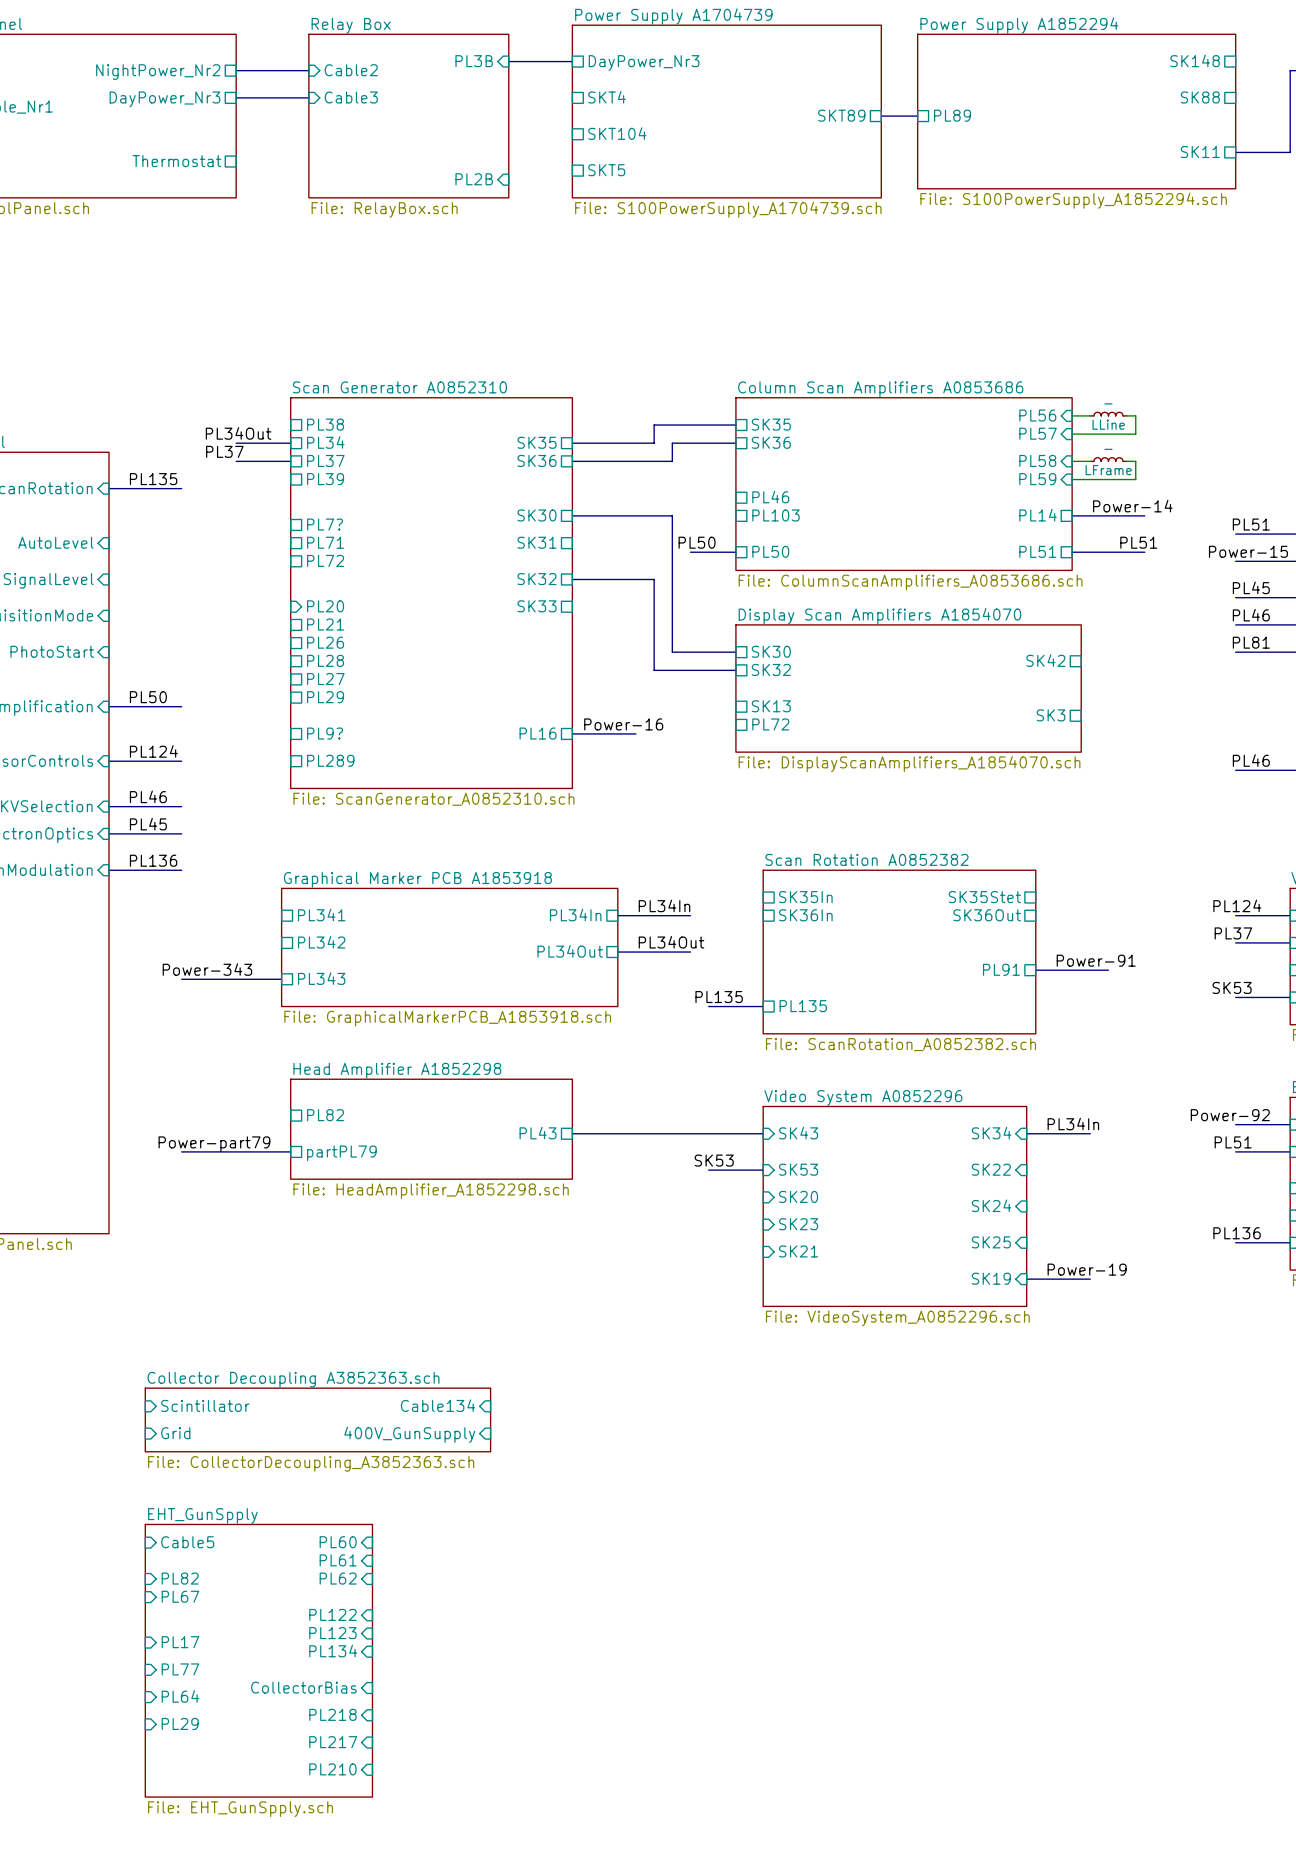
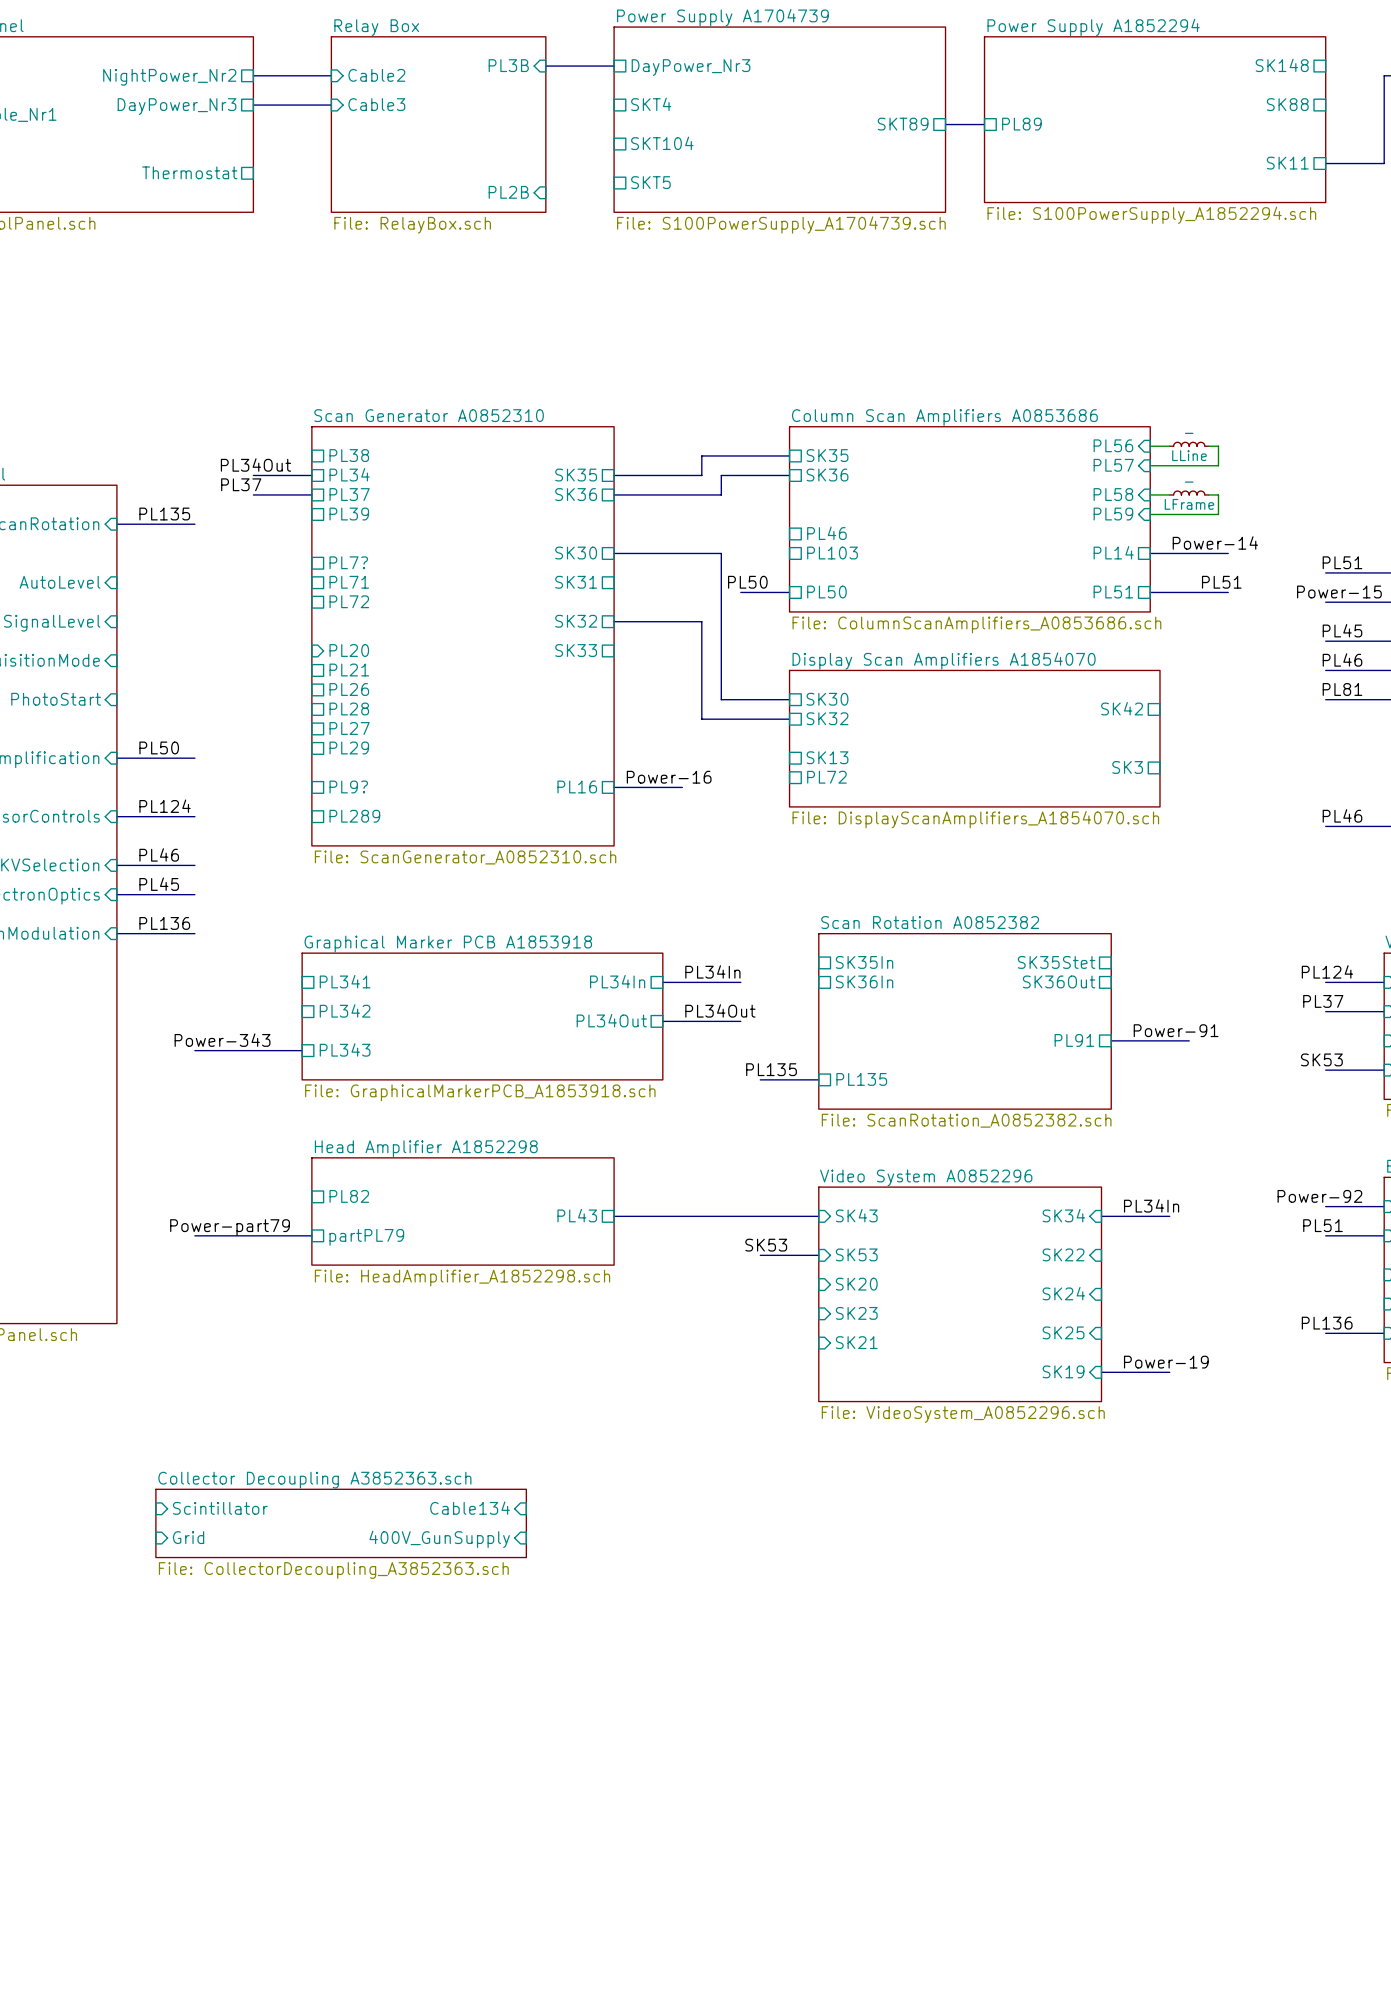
sheet pin: Cable5 (187, 1542) -> none
sheet pin: PL60 (338, 1542) -> none
sheet pin: PL61 (338, 1560) -> none
sheet pin: PL82 (180, 1578) -> none
sheet pin: PL62 (338, 1578) -> none
sheet pin: PL67 (180, 1596) -> none
sheet pin: PL122 (332, 1614) -> none
sheet pin: PL123 (332, 1633) -> none
sheet pin: PL17 (180, 1642) -> none
sheet pin: PL134 (333, 1651) -> none
sheet EHT_GunSpply: File: EHT_GunSpply.sch (258, 1660) -> none
sheet pin: PL77 (180, 1669) -> none
sheet pin: CollectorBias (303, 1687) -> none
sheet pin: PL64 (180, 1696) -> none
sheet pin: PL218 (332, 1714) -> none
sheet pin: PL29 (180, 1723) -> none
sheet pin: PL217 (333, 1742) -> none
sheet pin: PL210 (332, 1769) -> none

